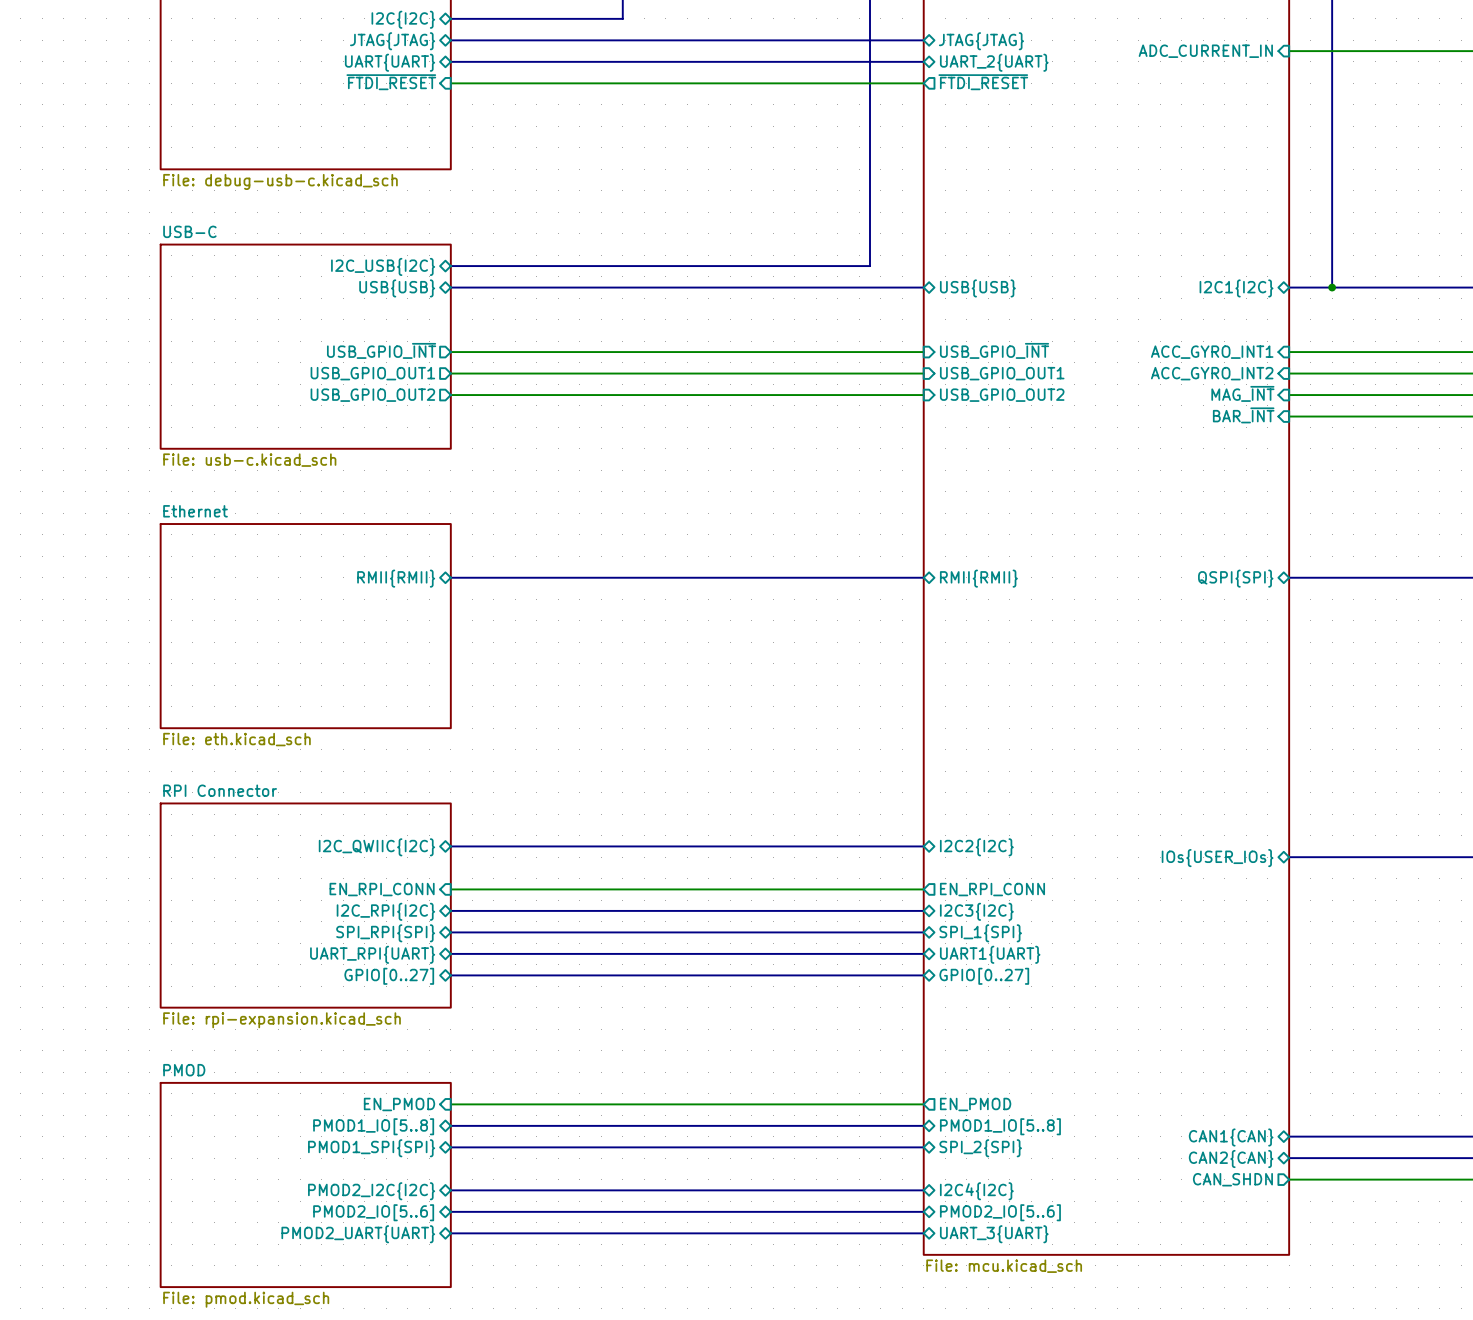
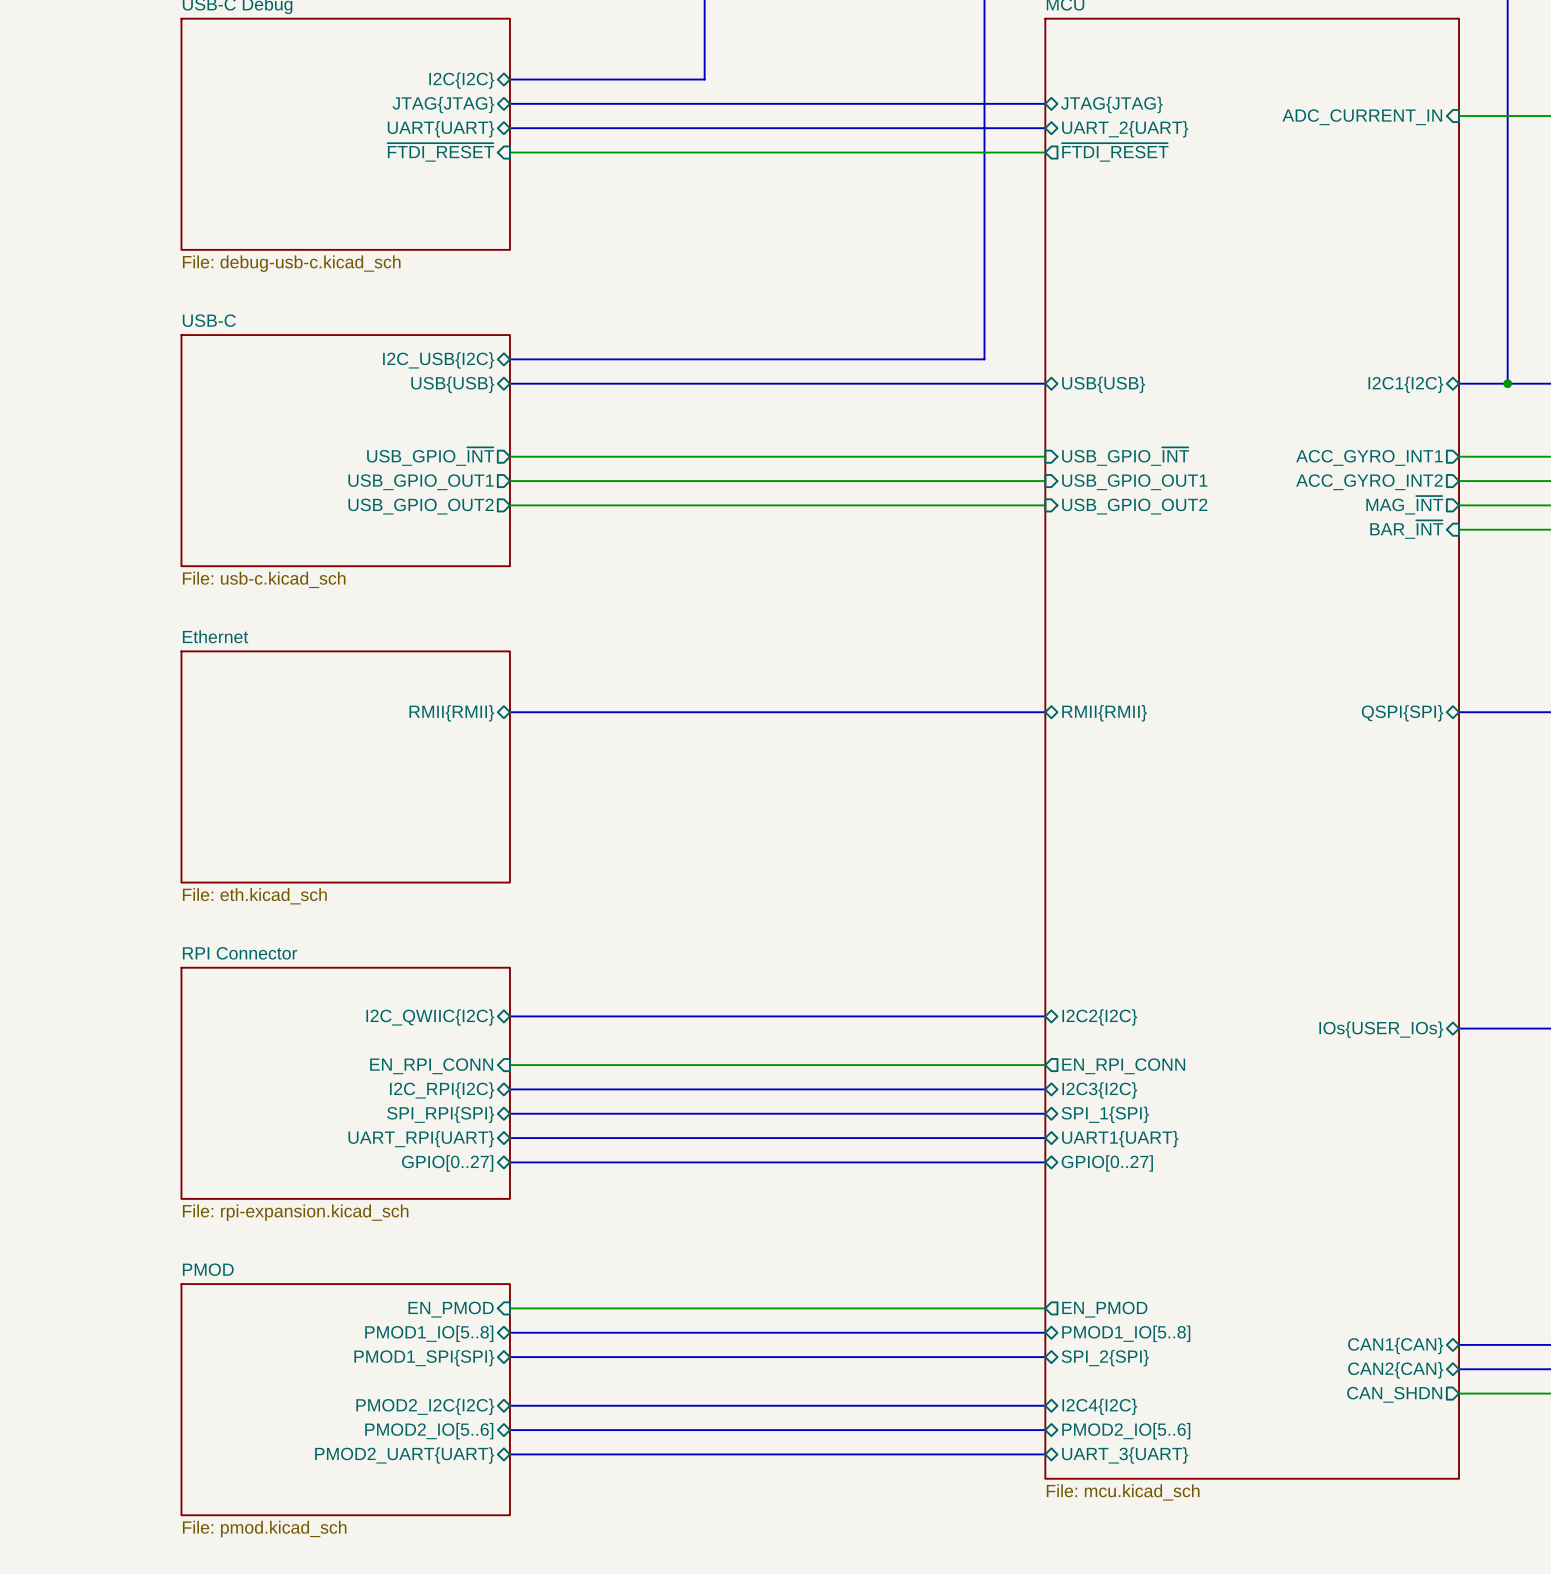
sheet pin shape: input (1212, 352) -> output (1369, 457)
sheet pin shape: input (1212, 373) -> output (1369, 482)
sheet pin shape: input (1242, 393) -> output (1404, 505)

